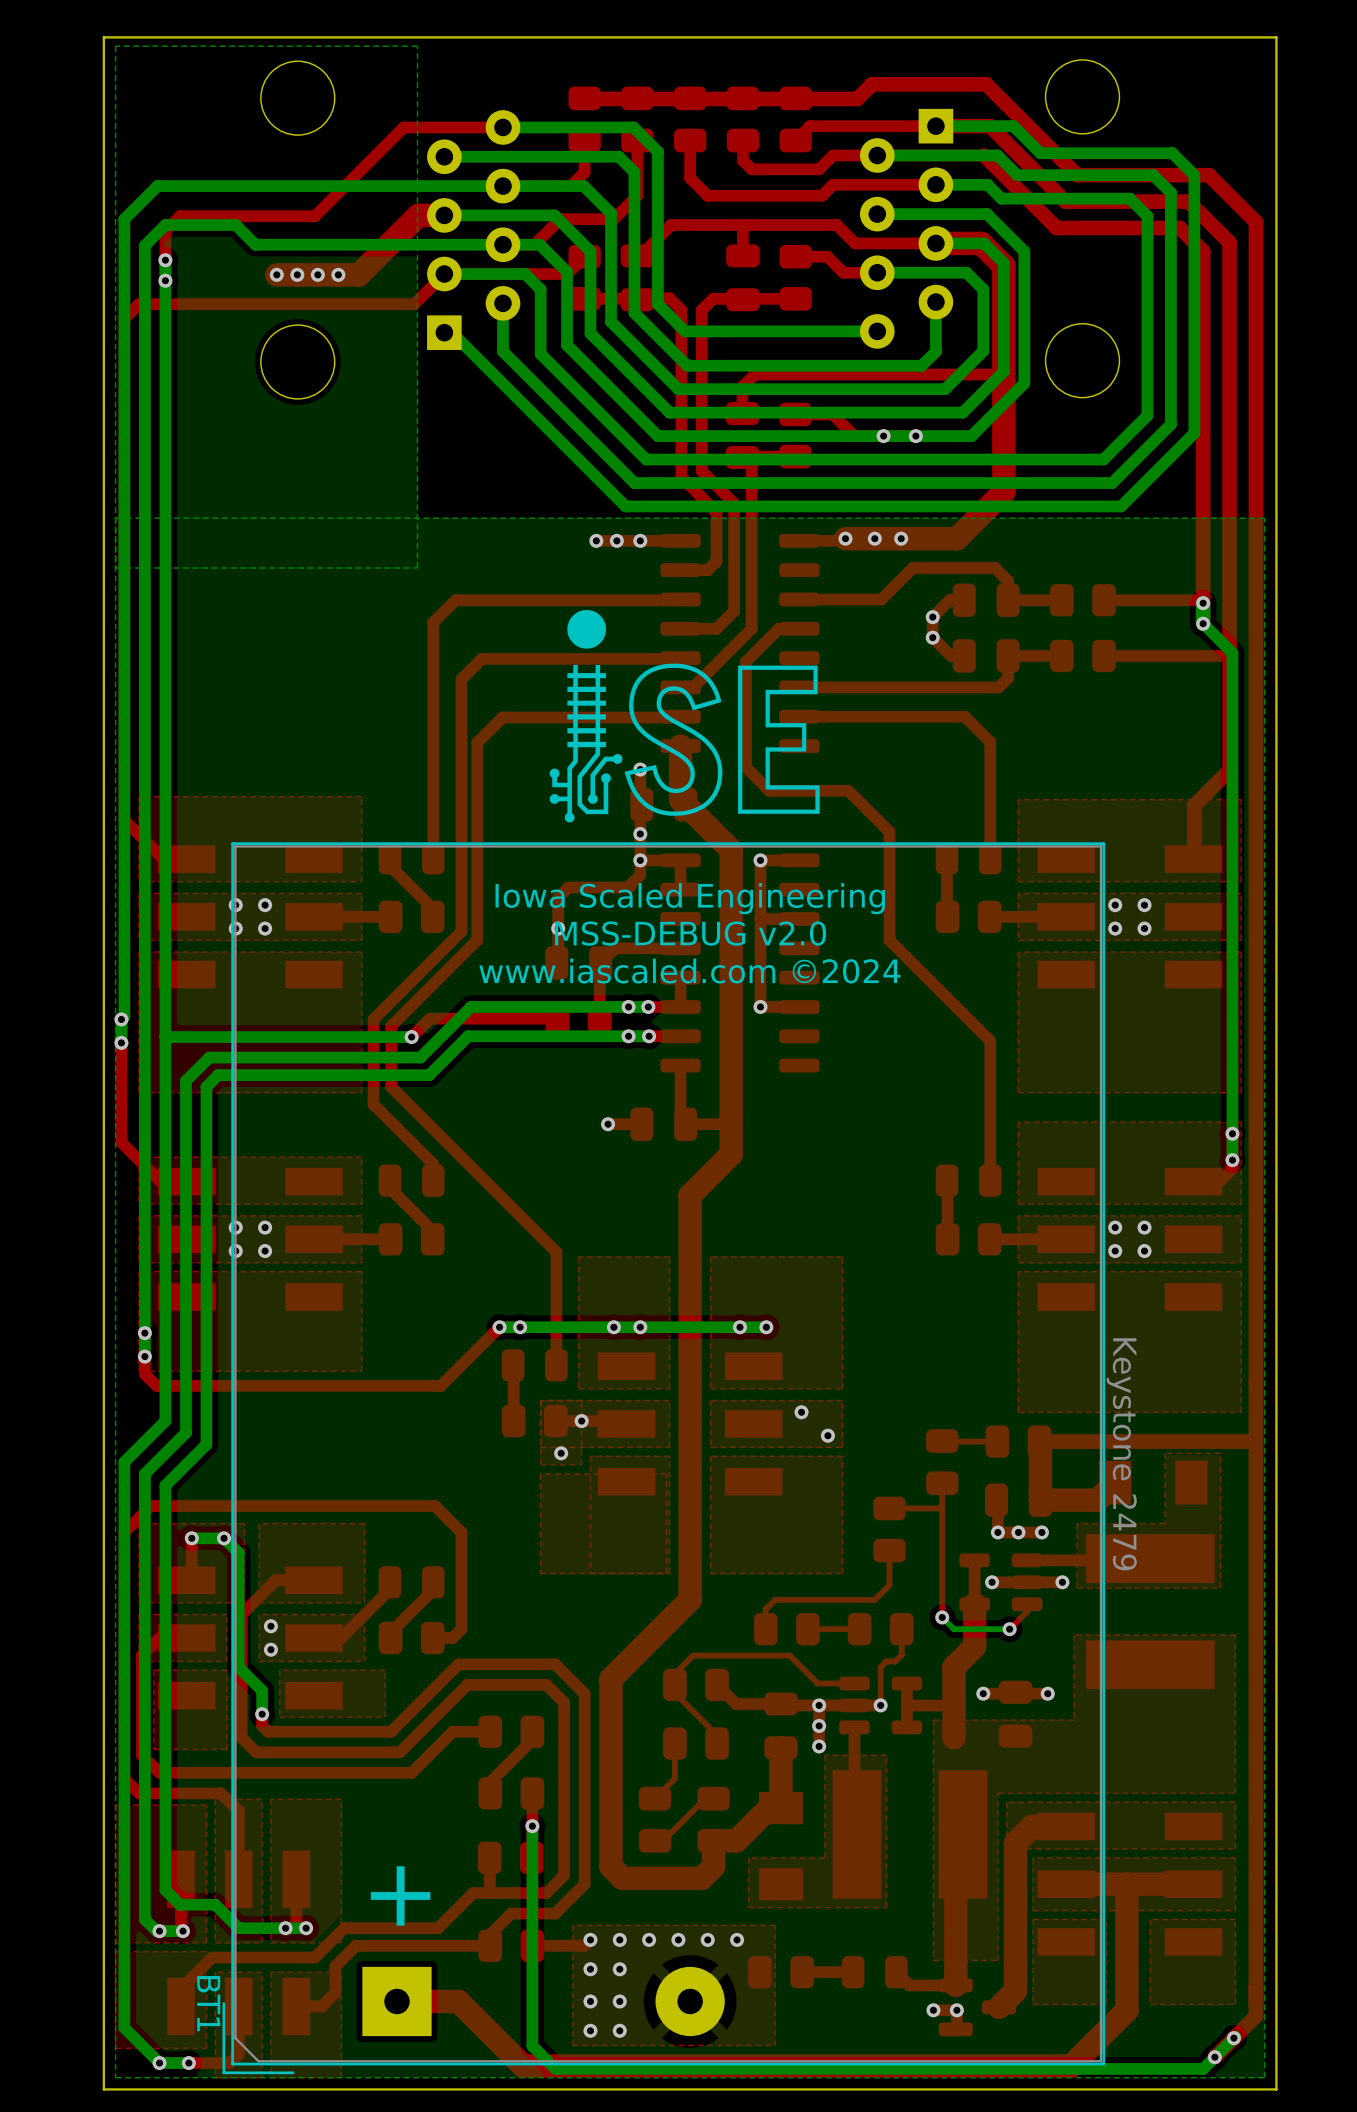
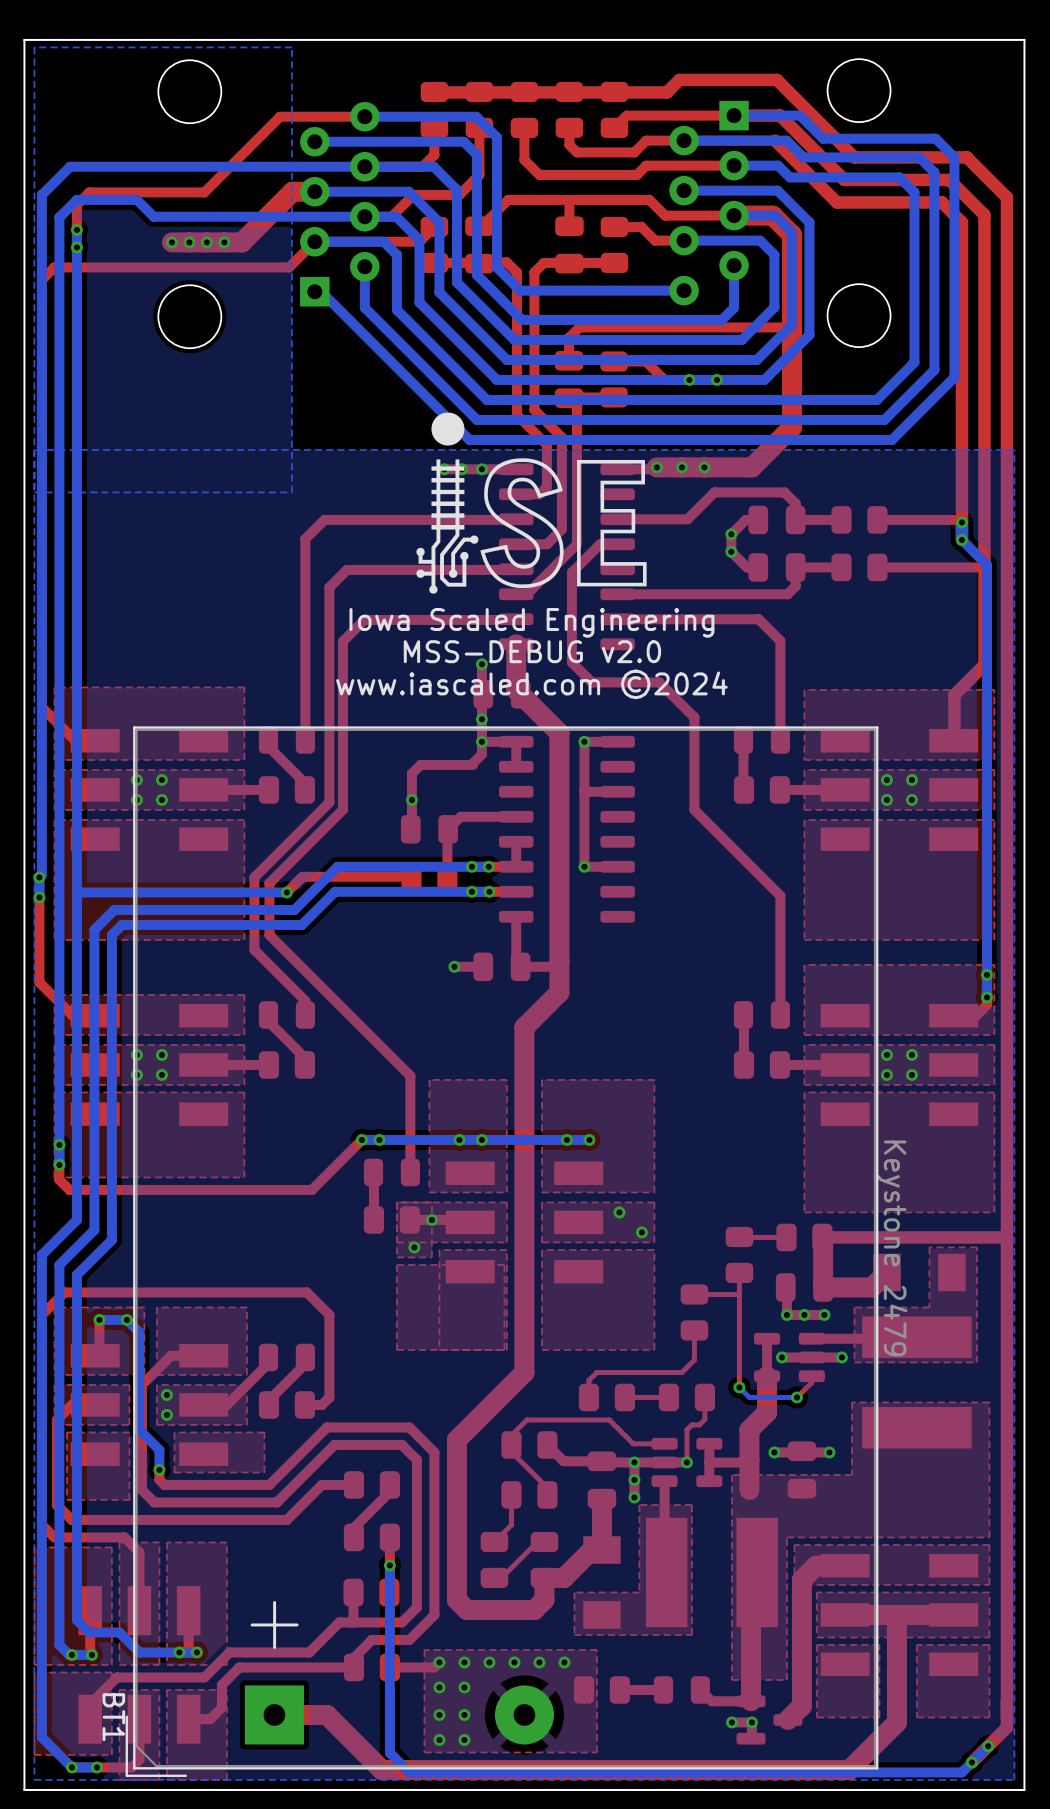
drawing position: (586, 629) -> (447, 429)
drawing position: (673, 739) -> (522, 523)
drawing position: (778, 739) -> (611, 523)
drawing position: (580, 743) -> (442, 526)
drawing position: (605, 778) -> (463, 556)
text position: Iowa Scaled Engineering (690, 898) -> Iowa Scaled Engineering (531, 622)
text position: MSS-DEBUG v2.0 (690, 933) -> MSS-DEBUG v2.0 (532, 651)
text position: www.iascaled.com ©2024 (689, 971) -> www.iascaled.com ©2024 (531, 684)

